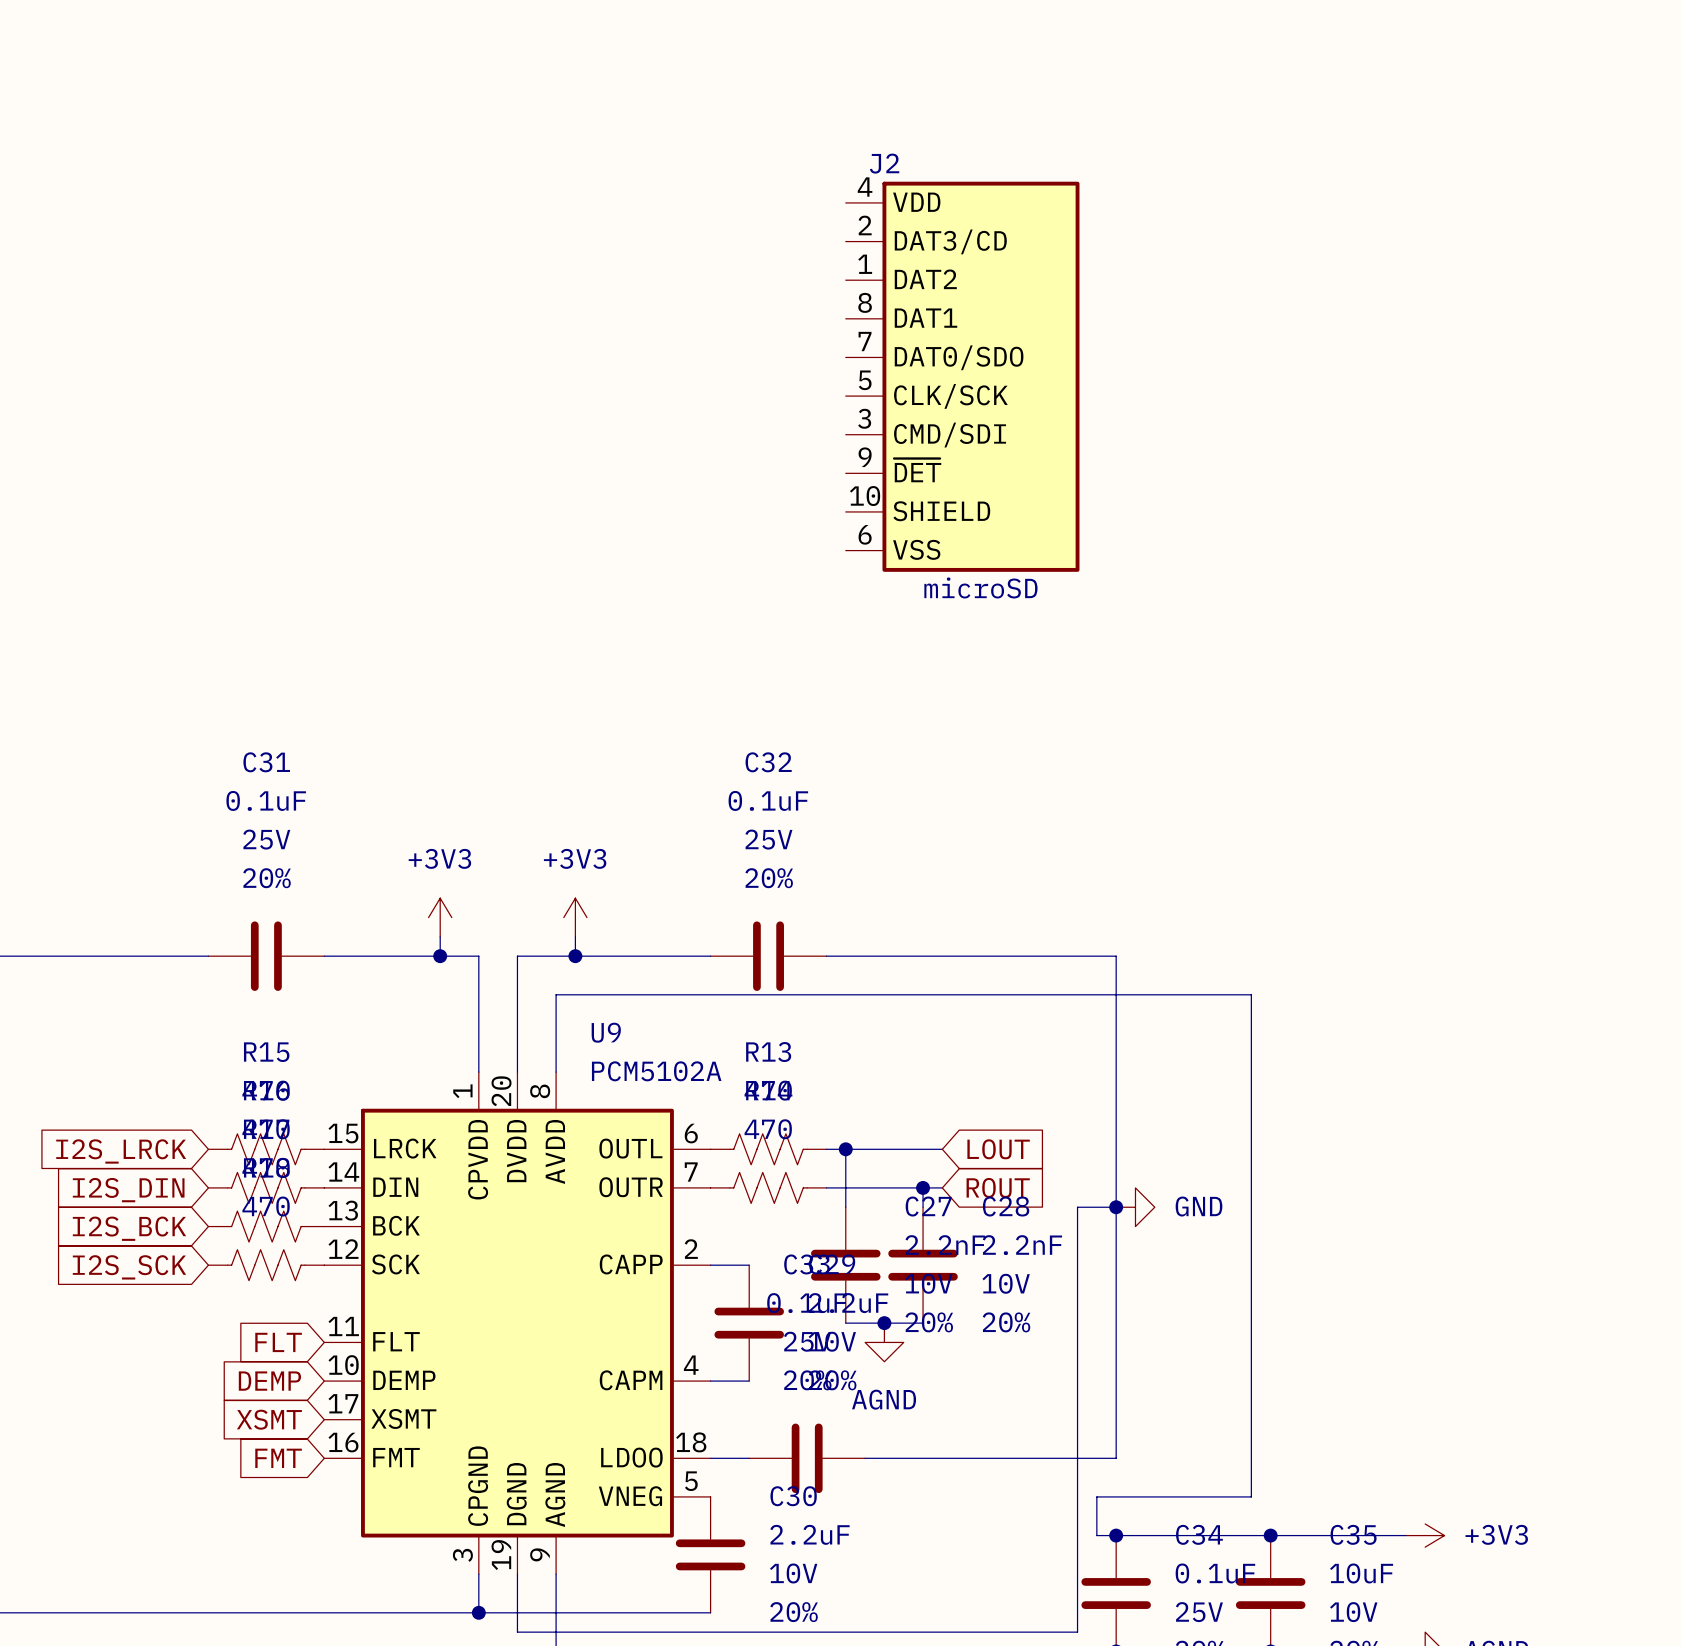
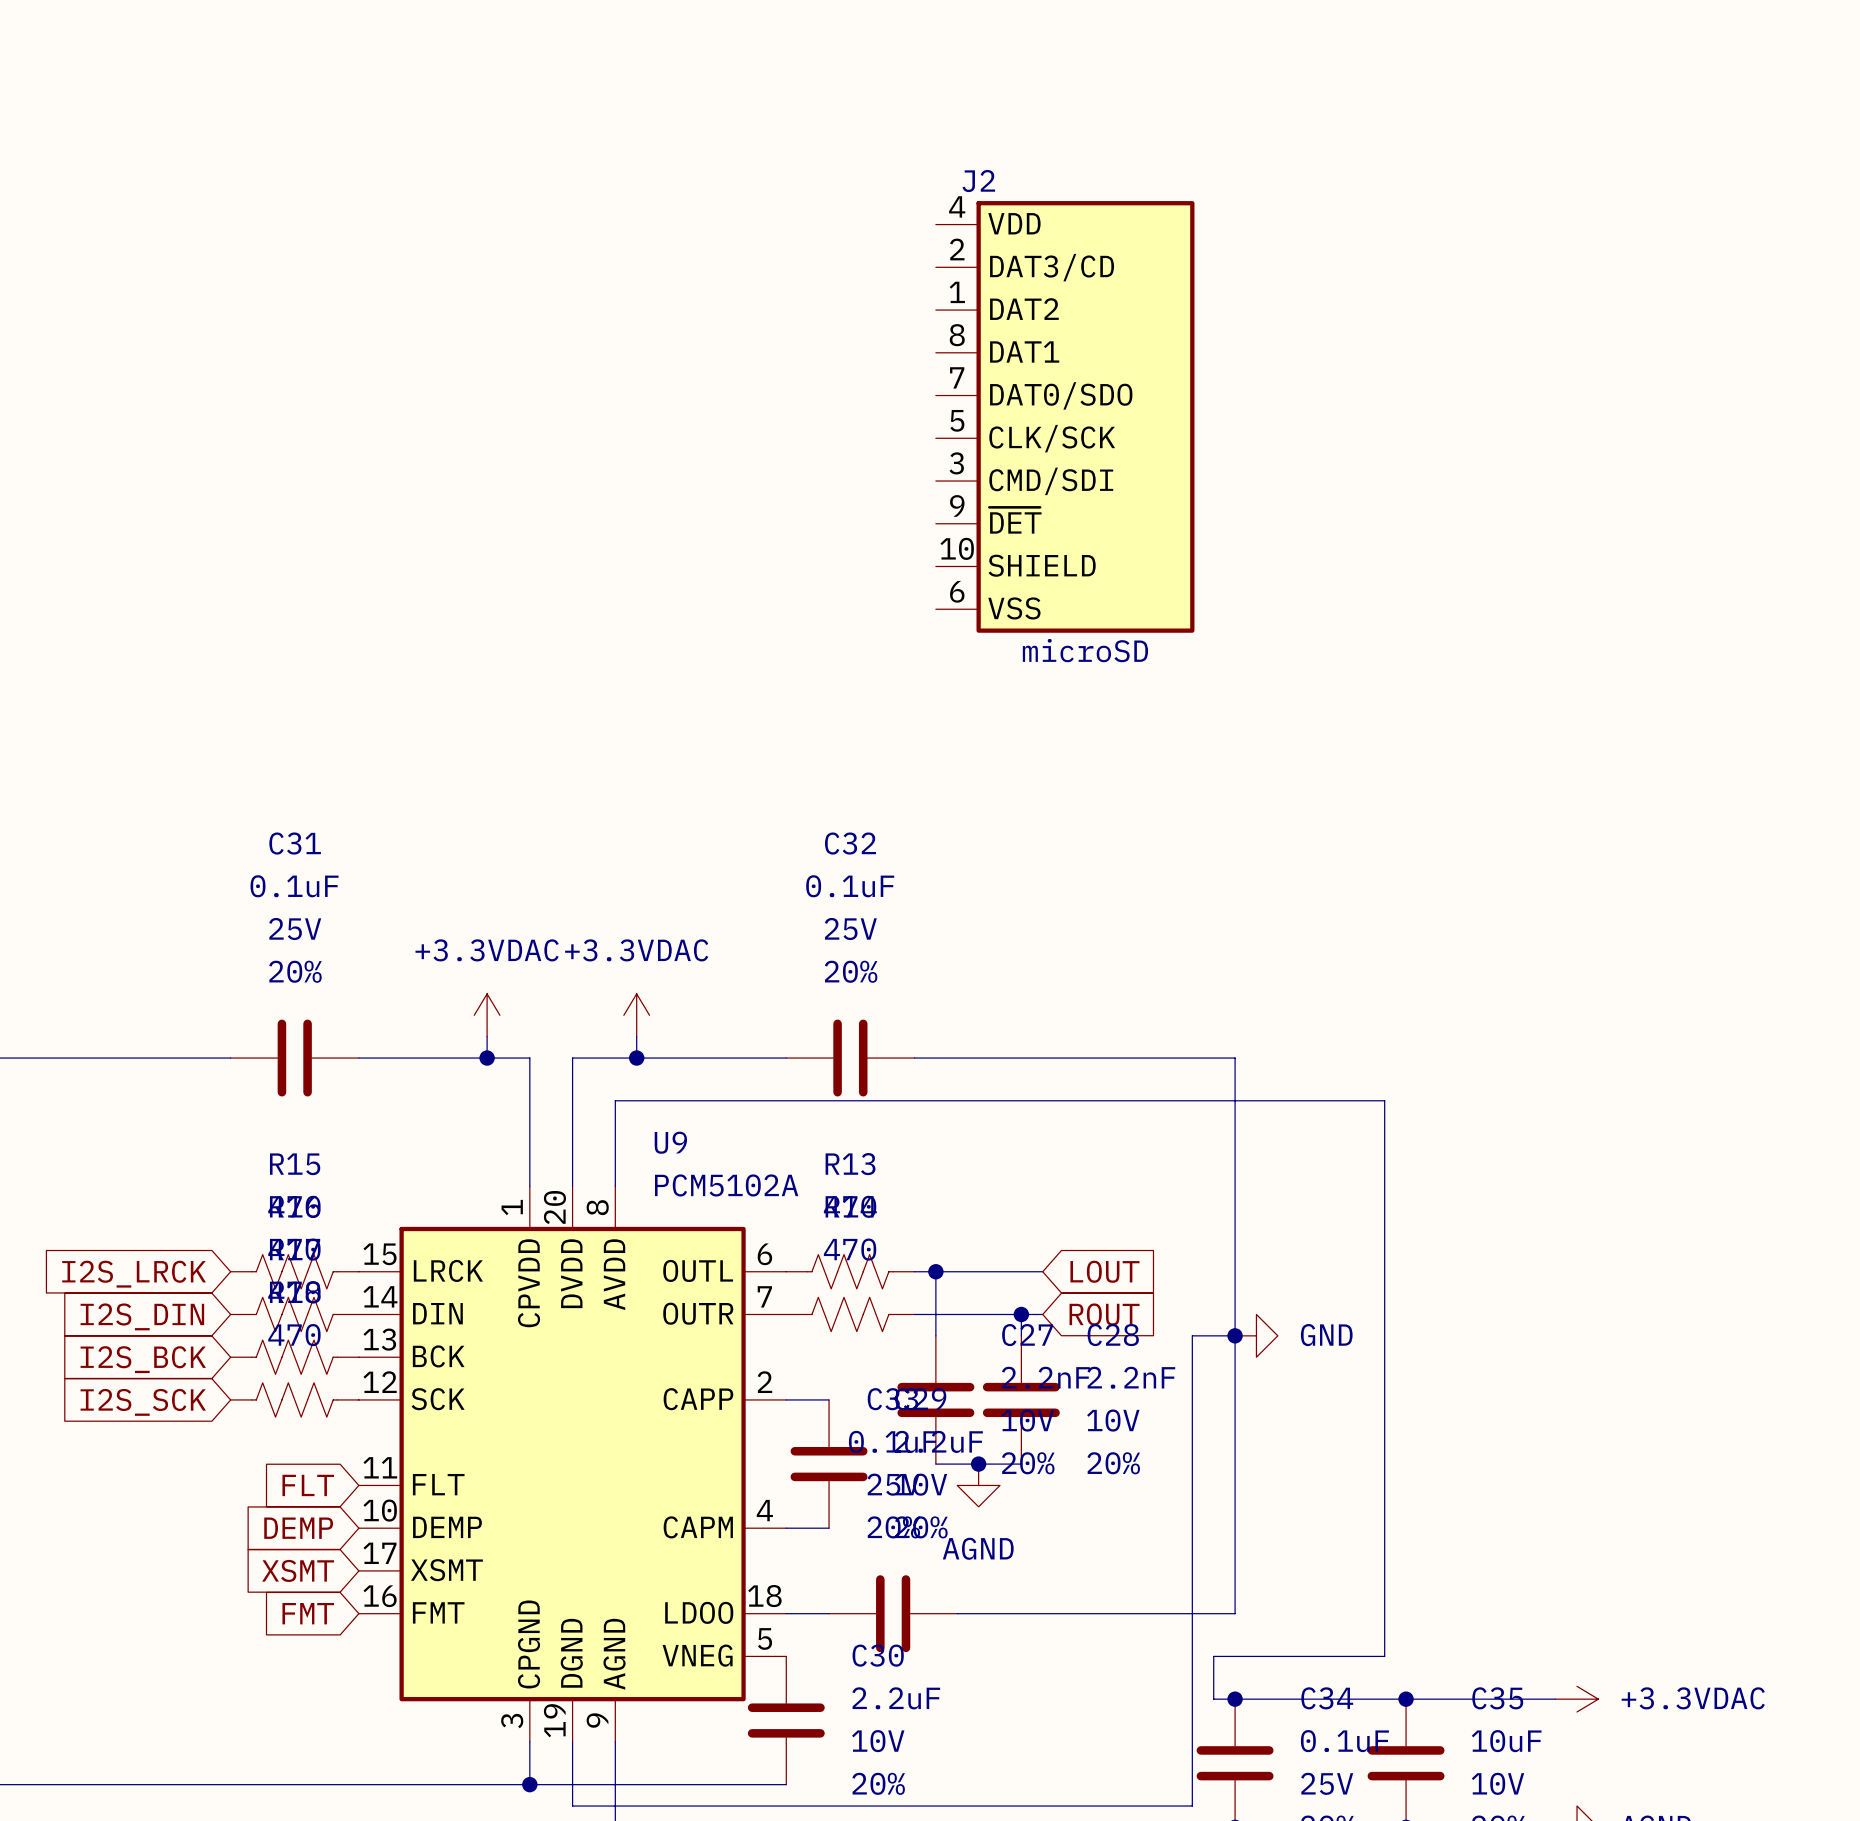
power symbol: +3V3 (440, 917) -> +3.3VDAC (487, 1015)
power symbol: +3V3 (575, 917) -> +3.3VDAC (636, 1015)
power symbol: +3V3 (1425, 1535) -> +3.3VDAC (1577, 1699)

